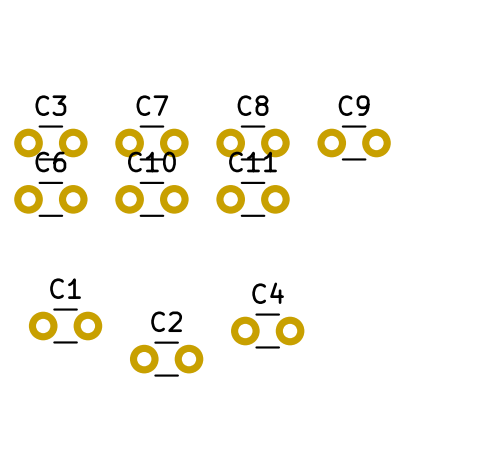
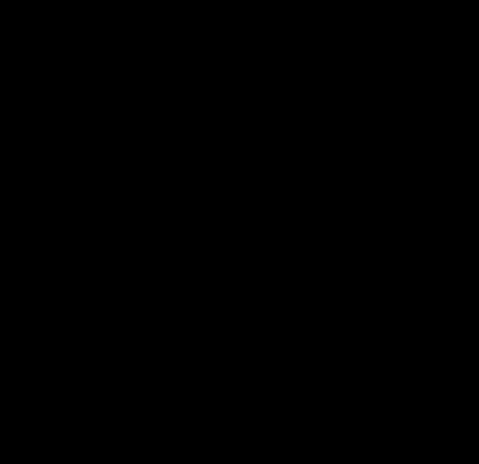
C3: (50, 143) -> none
C7: (151, 143) -> none
C8: (253, 143) -> none
C9: (354, 143) -> none
C6: (50, 199) -> none
C10: (151, 199) -> none
C11: (253, 199) -> none
C1: (65, 326) -> none
C4: (267, 331) -> none
C2: (166, 359) -> none

